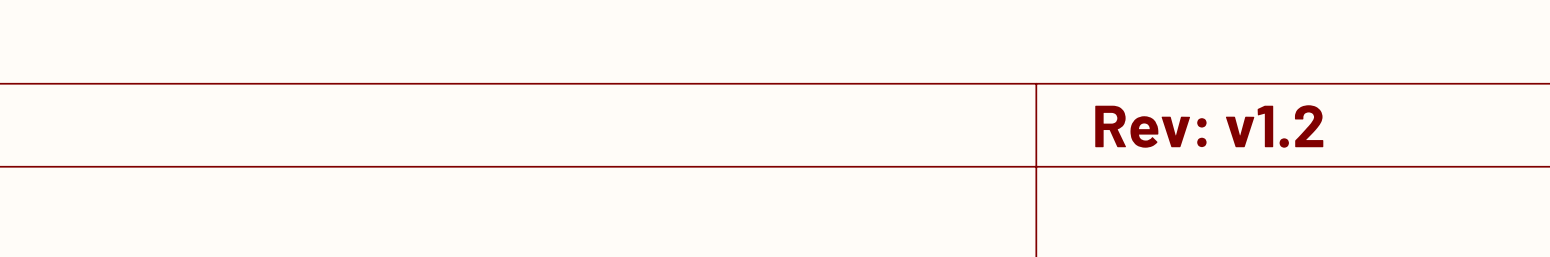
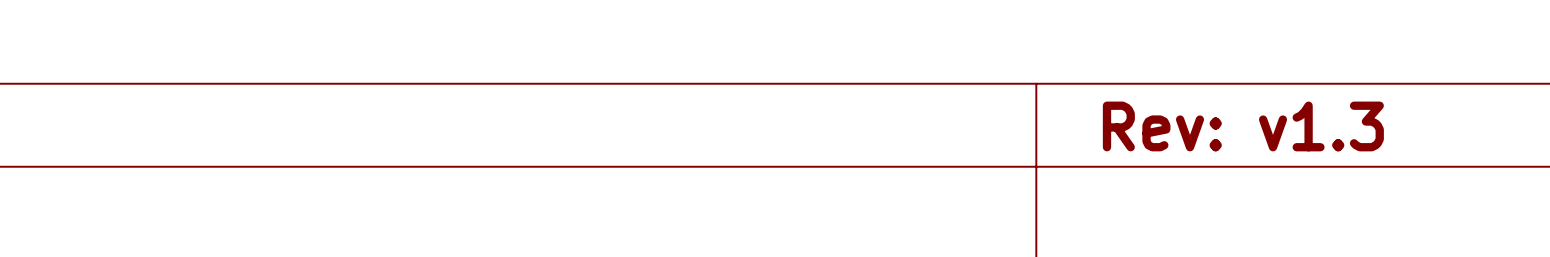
title block: Rev: v1.2 (1209, 126) -> Rev: v1.3 (1243, 126)

